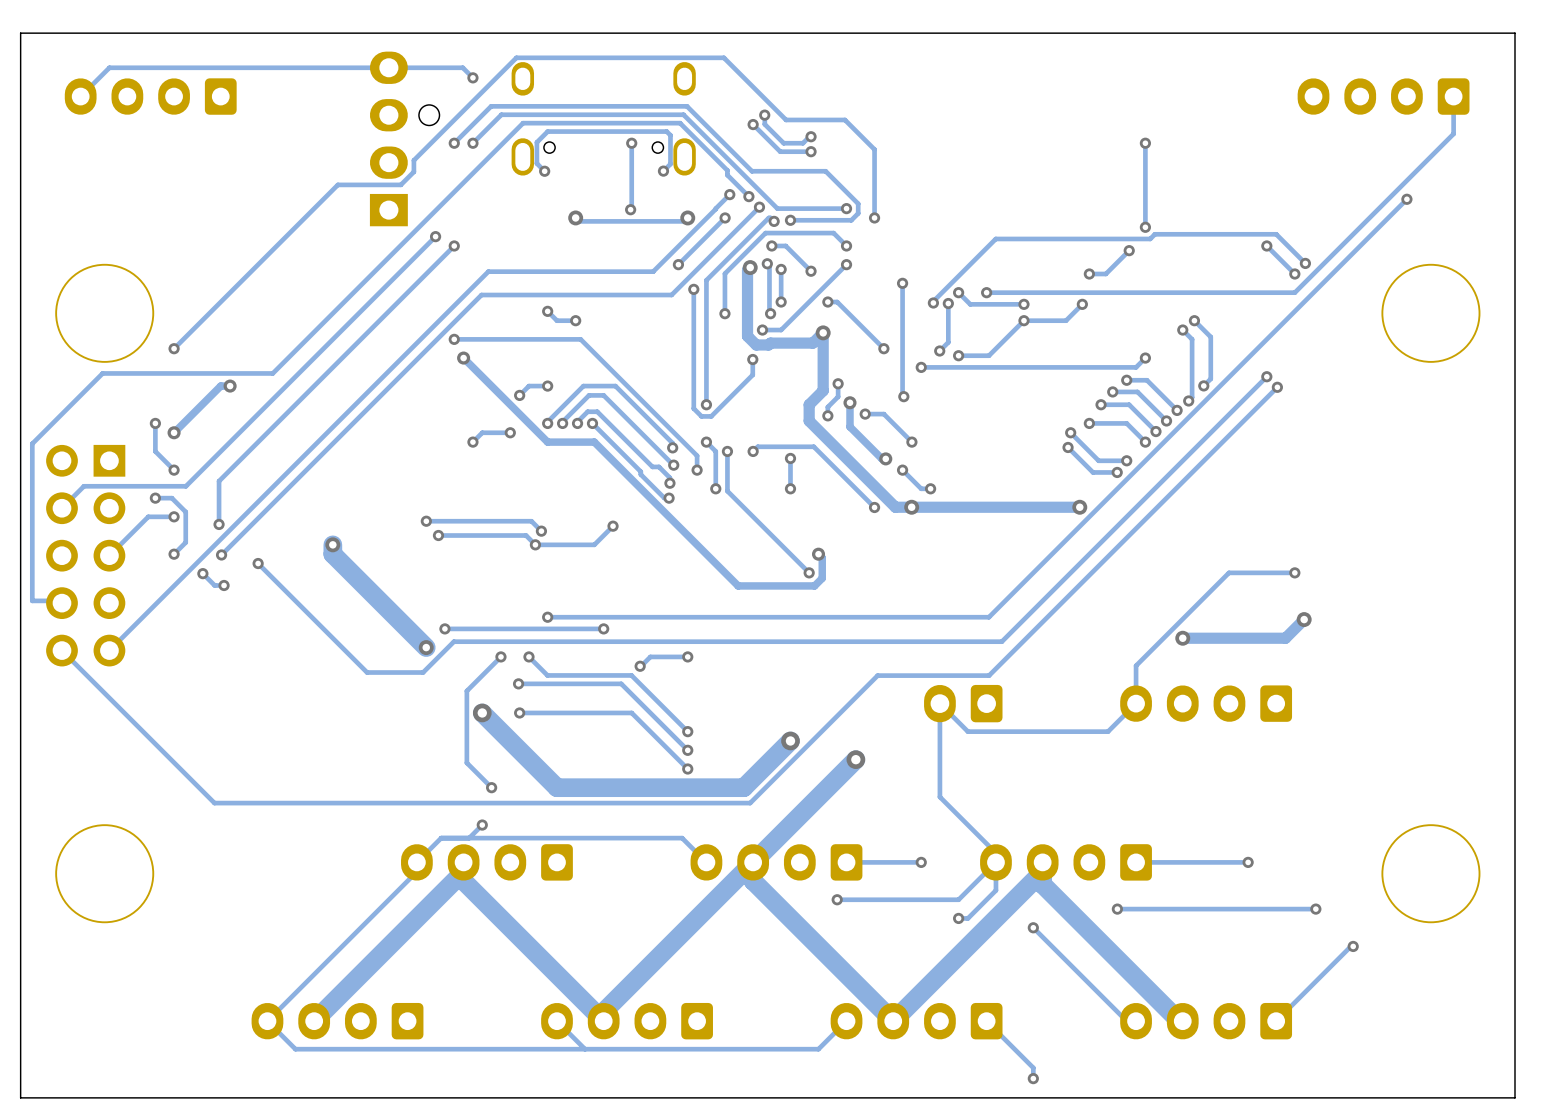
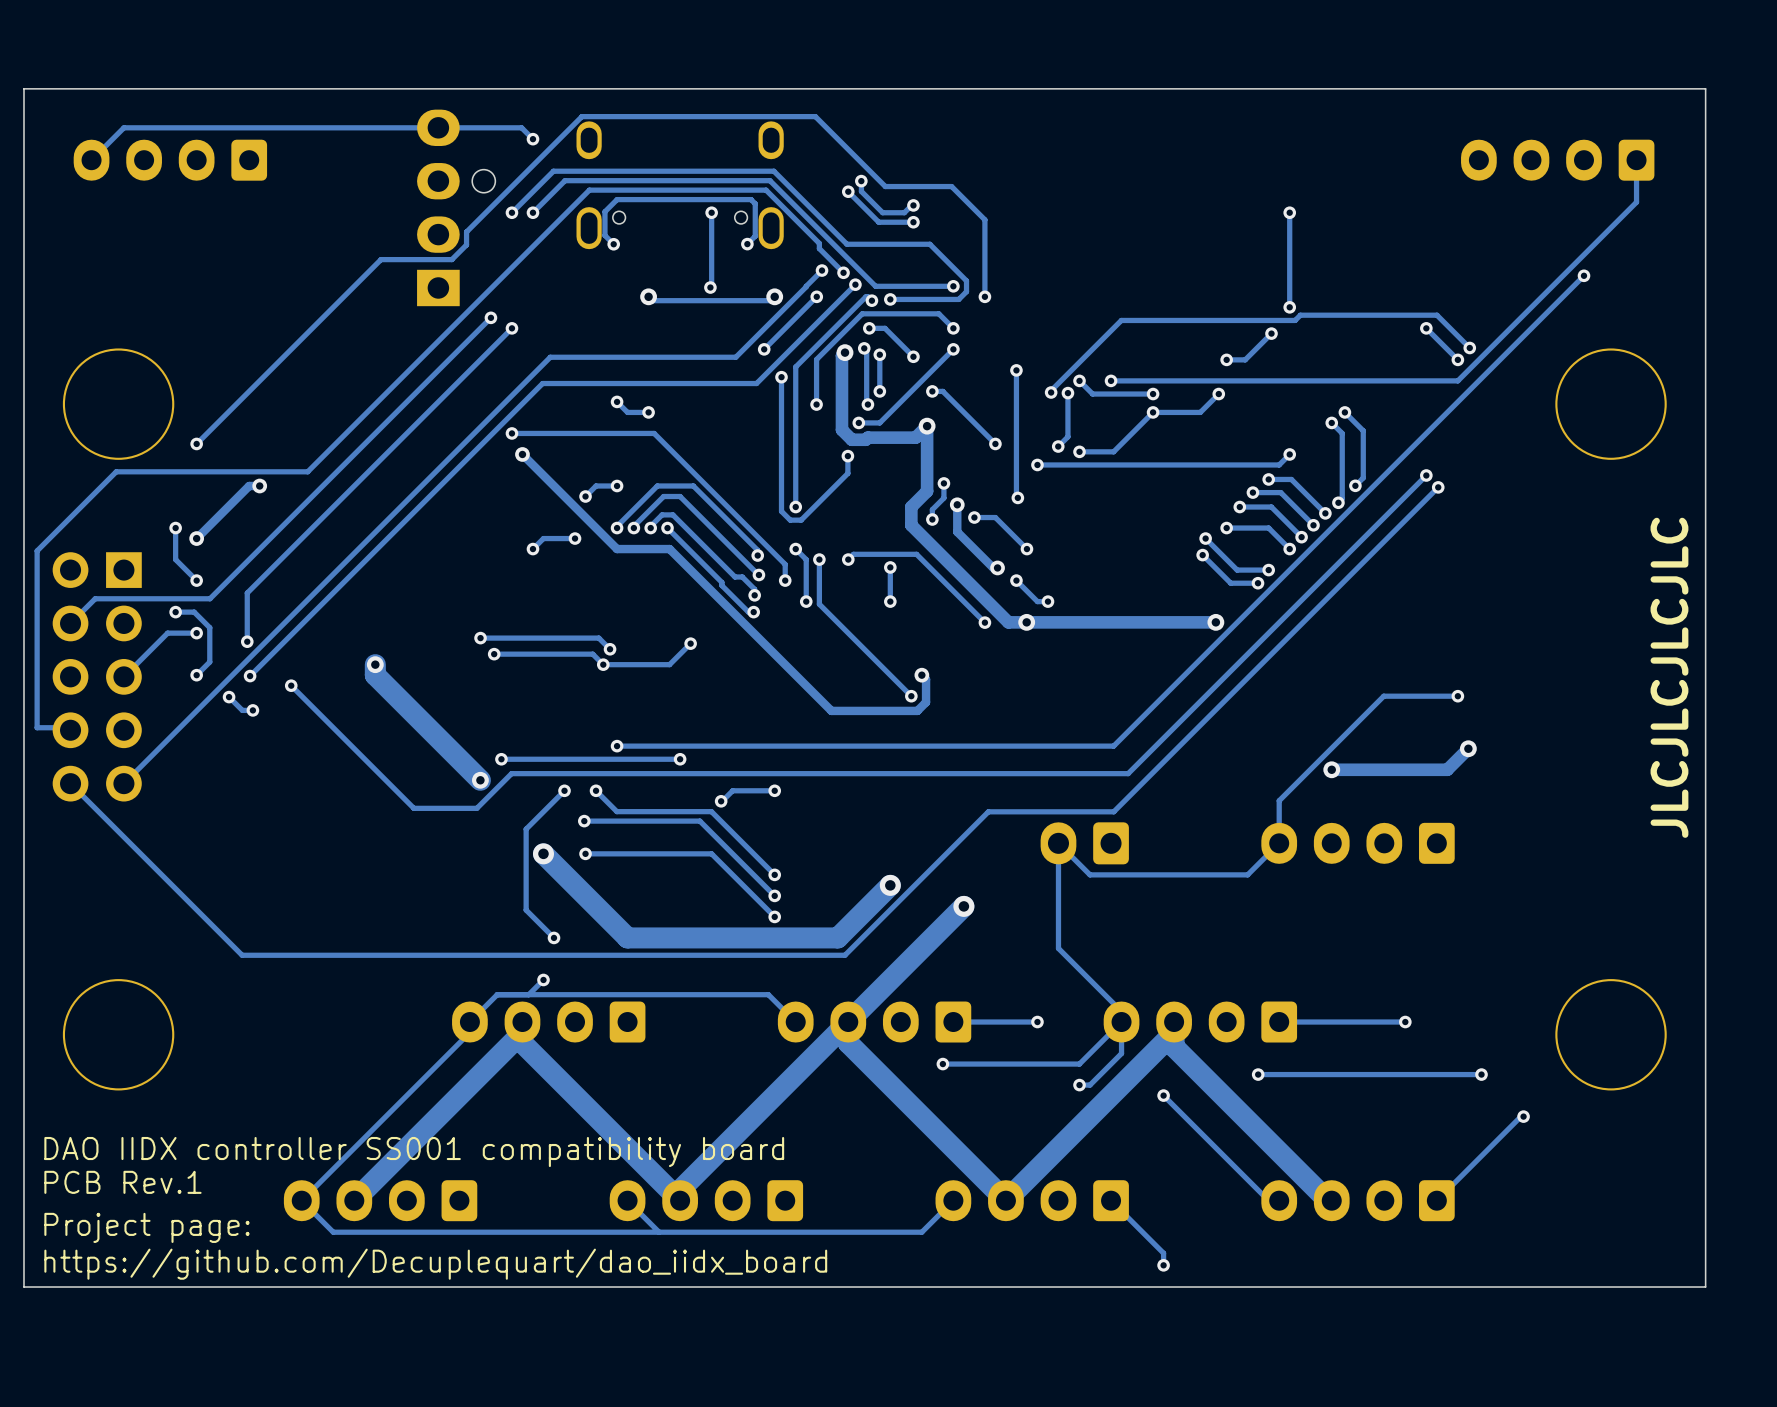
text: none -> JLCJLCJLCJLC (1669, 677)
text: none -> DAO IIDX controller SS001 compatibility board (414, 1152)
text: none -> PCB Rev.1 (122, 1182)
text: none -> Project page: (146, 1227)
text: none -> https://github.com/Decuplequart/dao_iidx_board (435, 1264)

